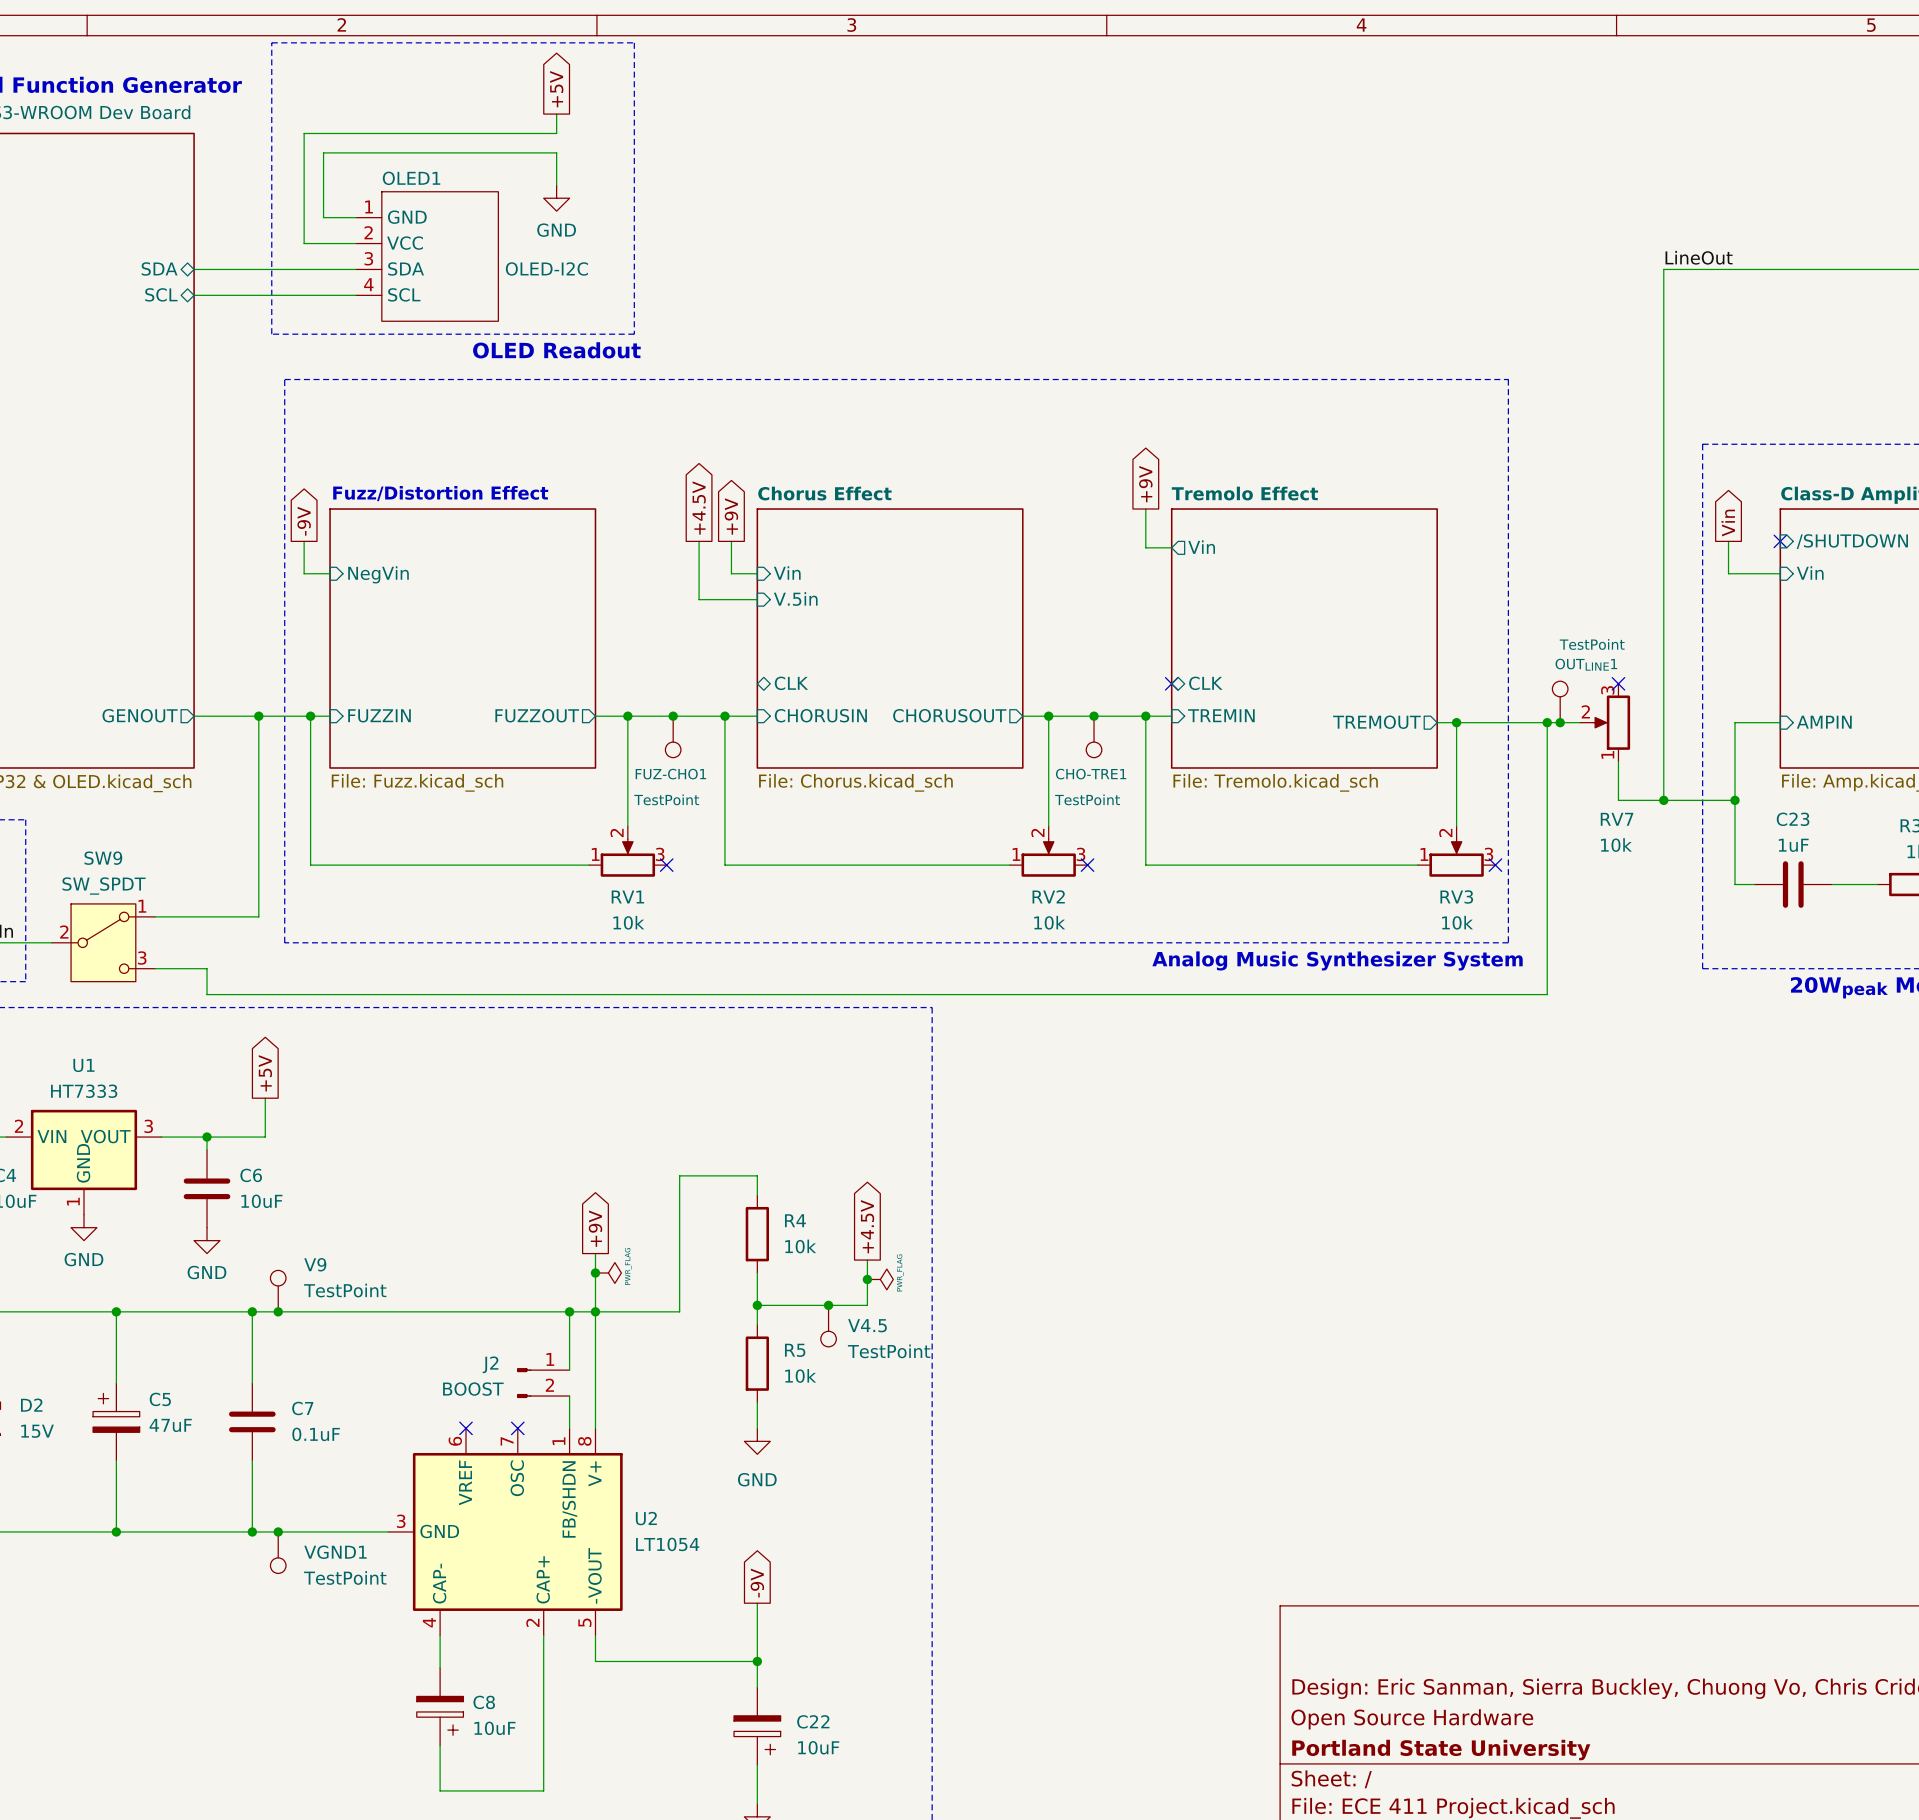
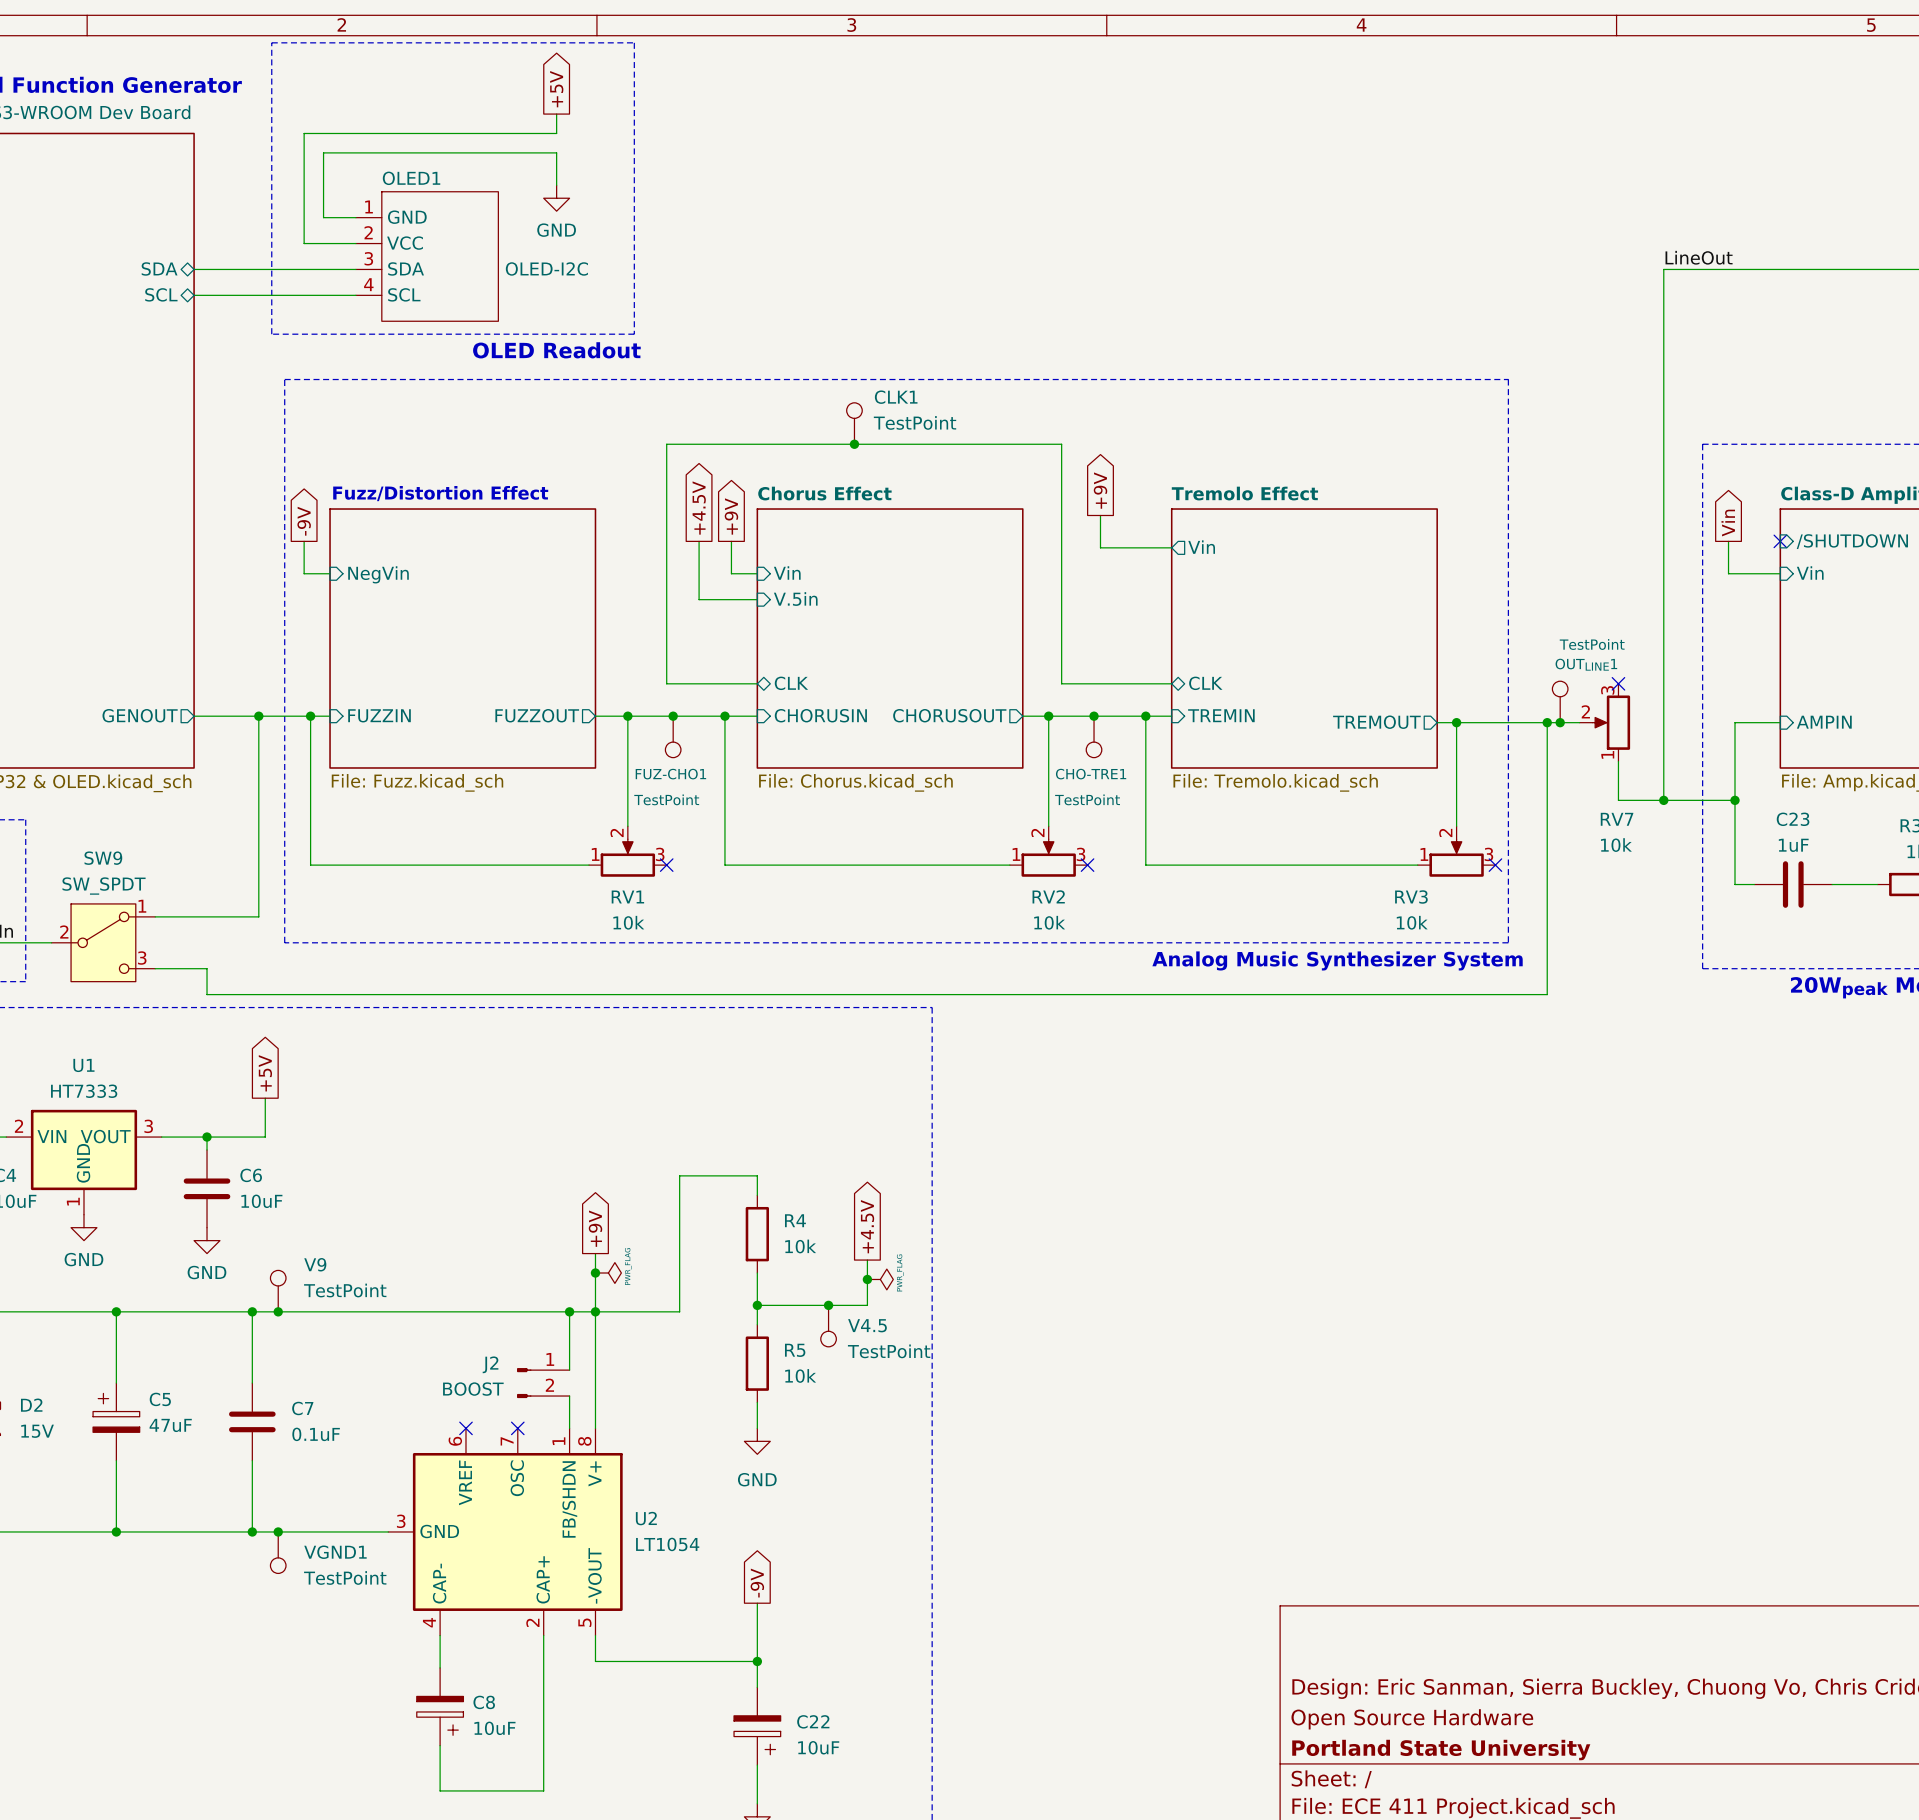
CLK1: none -> TestPoint (854, 423)
junction: none -> (854, 444)
global label position: +9V (1145, 484) -> +9V (1100, 490)
wire: (1145, 509) (1145, 547) -> (1100, 515) (1100, 547) (1145, 547)
wire: none -> (757, 683) (666, 683) (666, 444) (1061, 444) (1061, 683) (1171, 683)
no-connect mark: (1171, 683) -> none
RV3 name position: RV3 (1456, 897) -> RV3 (1411, 897)
RV3 value position: 10k (1457, 922) -> 10k (1412, 922)

